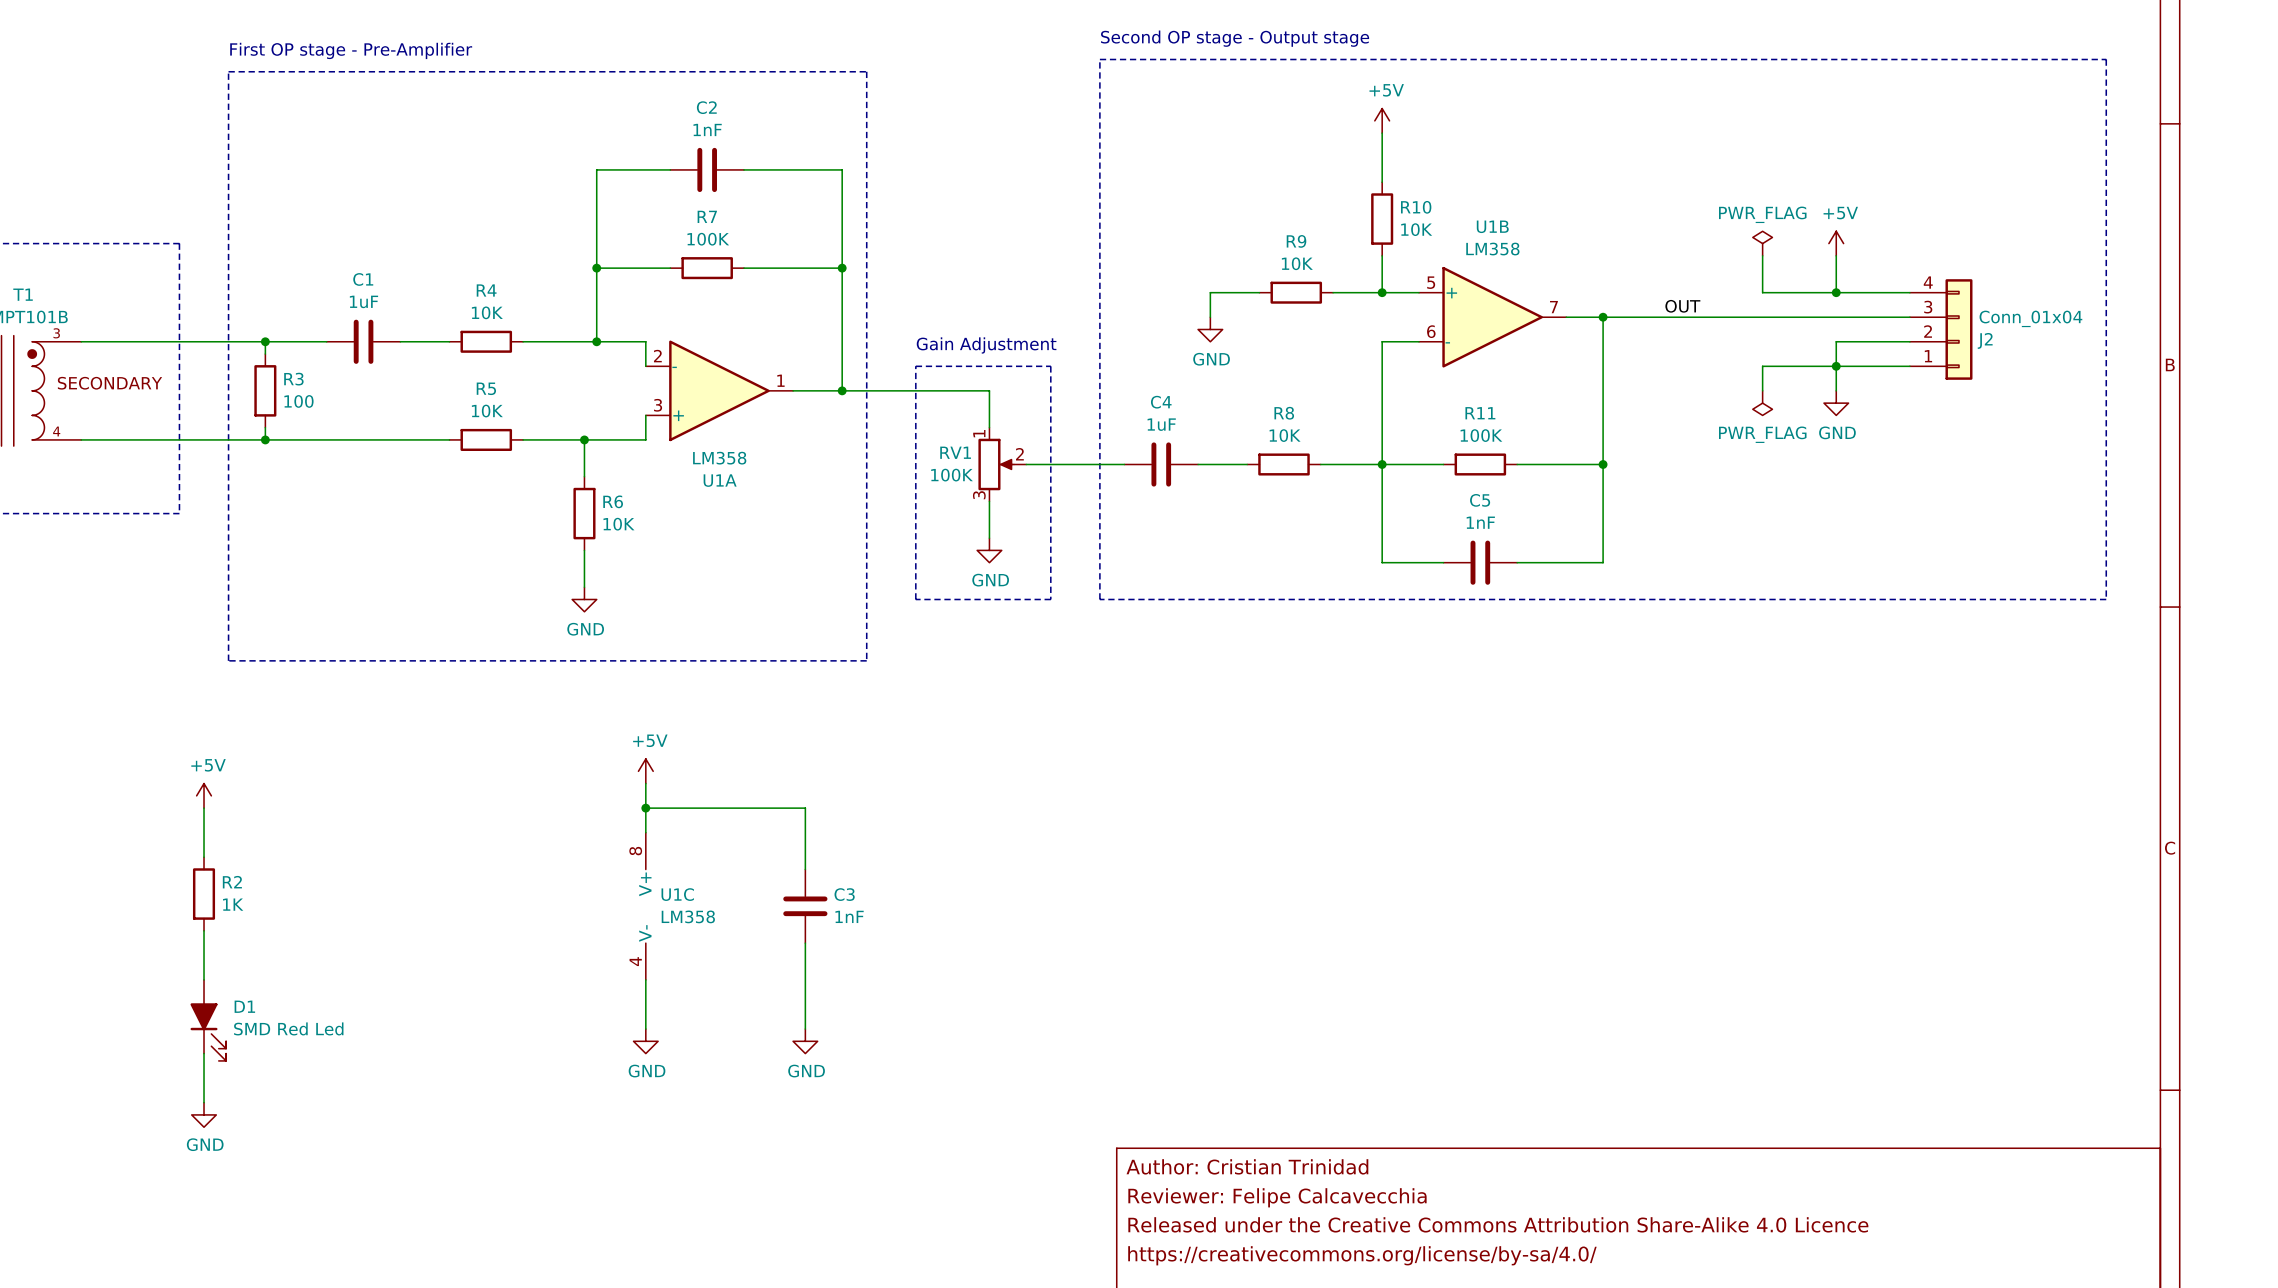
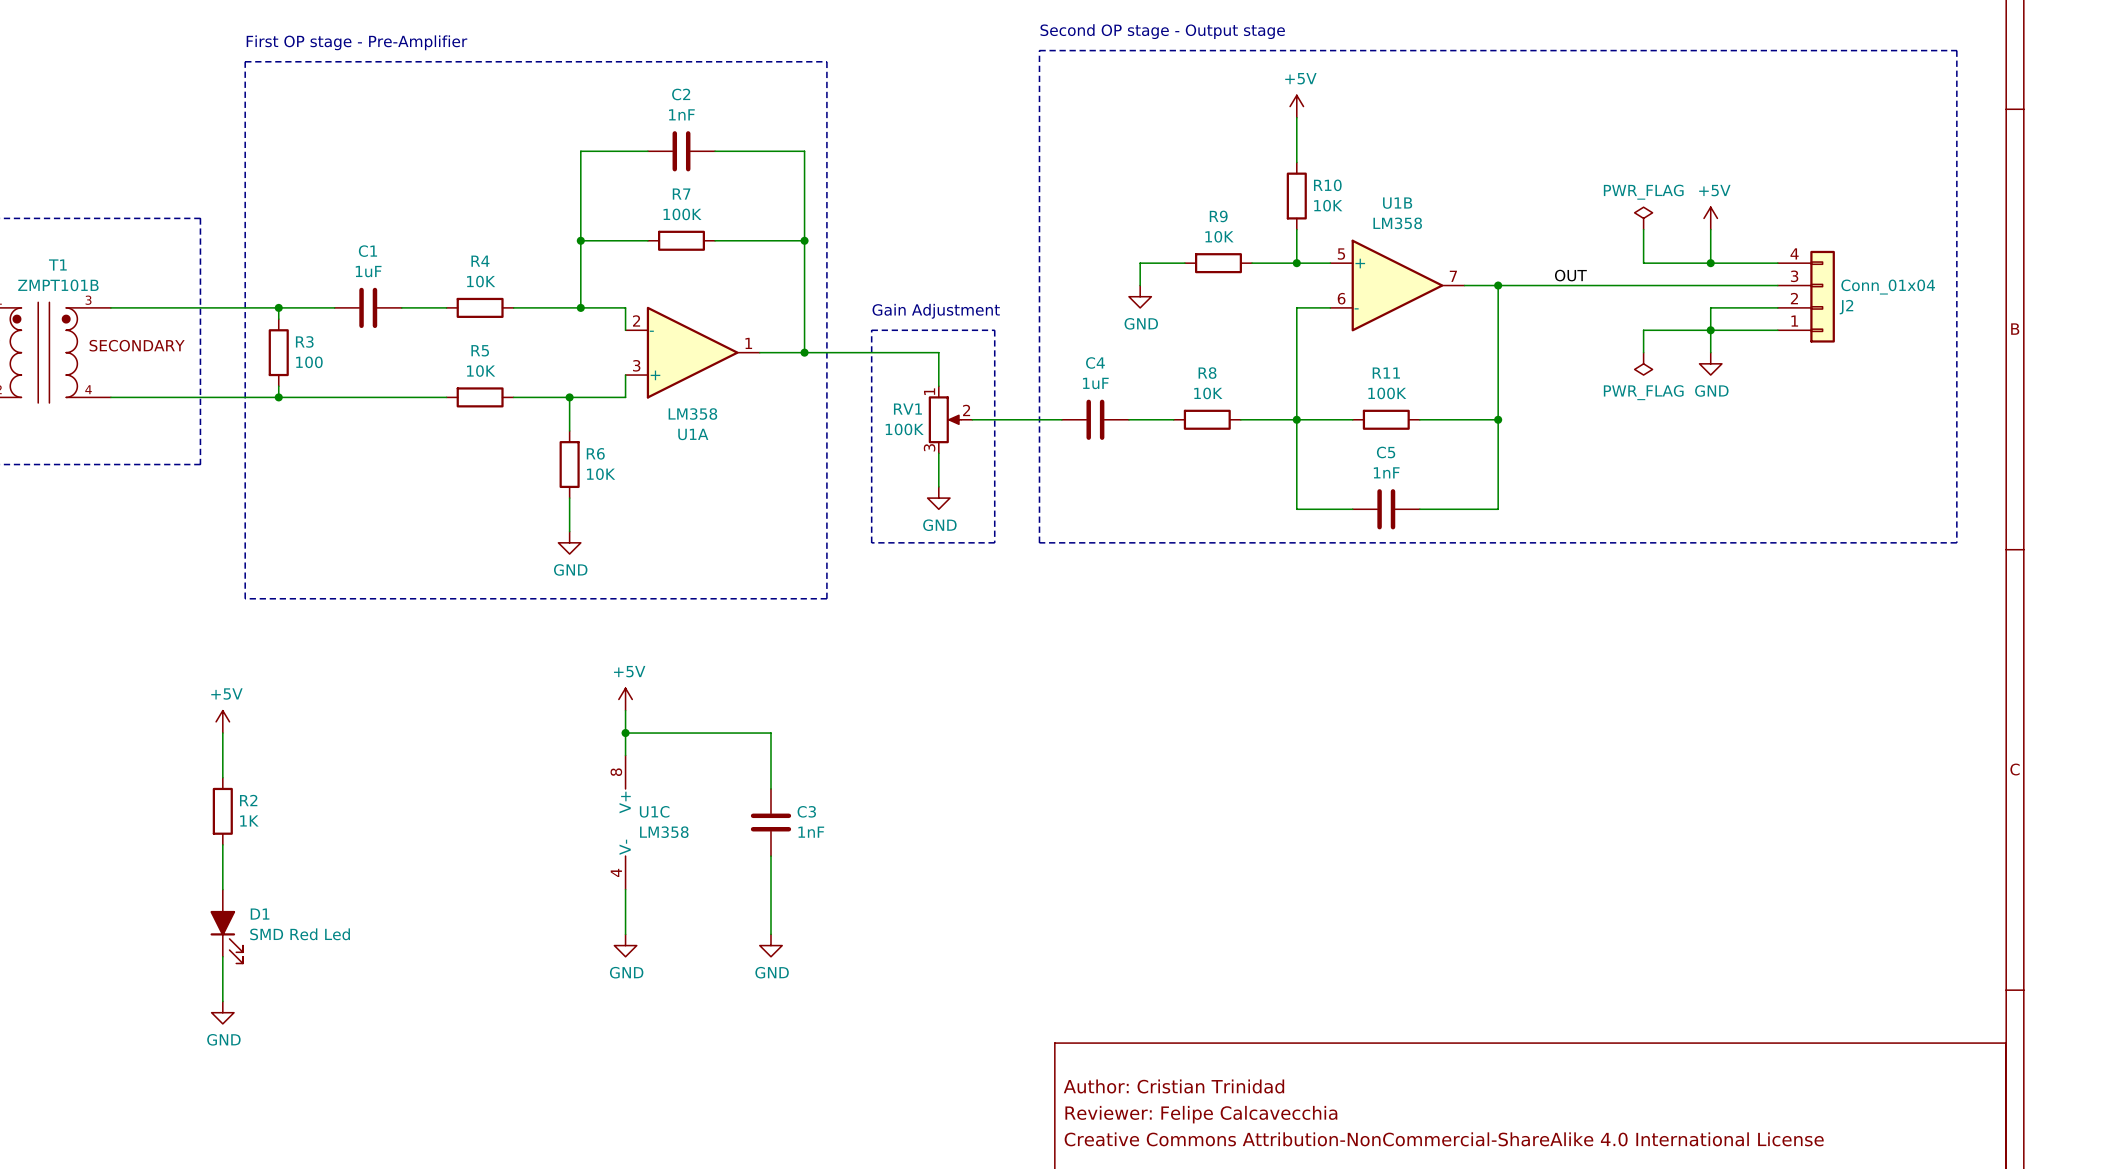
title block: Author: Cristian Trinidad (1247, 1166) -> none
title block: Reviewer: Felipe Calcavecchia (1277, 1197) -> Author: Cristian Trinidad (1173, 1086)
title block: Released under the Creative Commons Attribution Share-Alike 4.0 Licence (1498, 1224) -> Reviewer: Felipe Calcavecchia (1201, 1114)
title block: https://creativecommons.org/license/by-sa/4.0/ (1362, 1255) -> Creative Commons Attribution-NonCommercial-ShareAlike 4.0 International License (1444, 1139)

